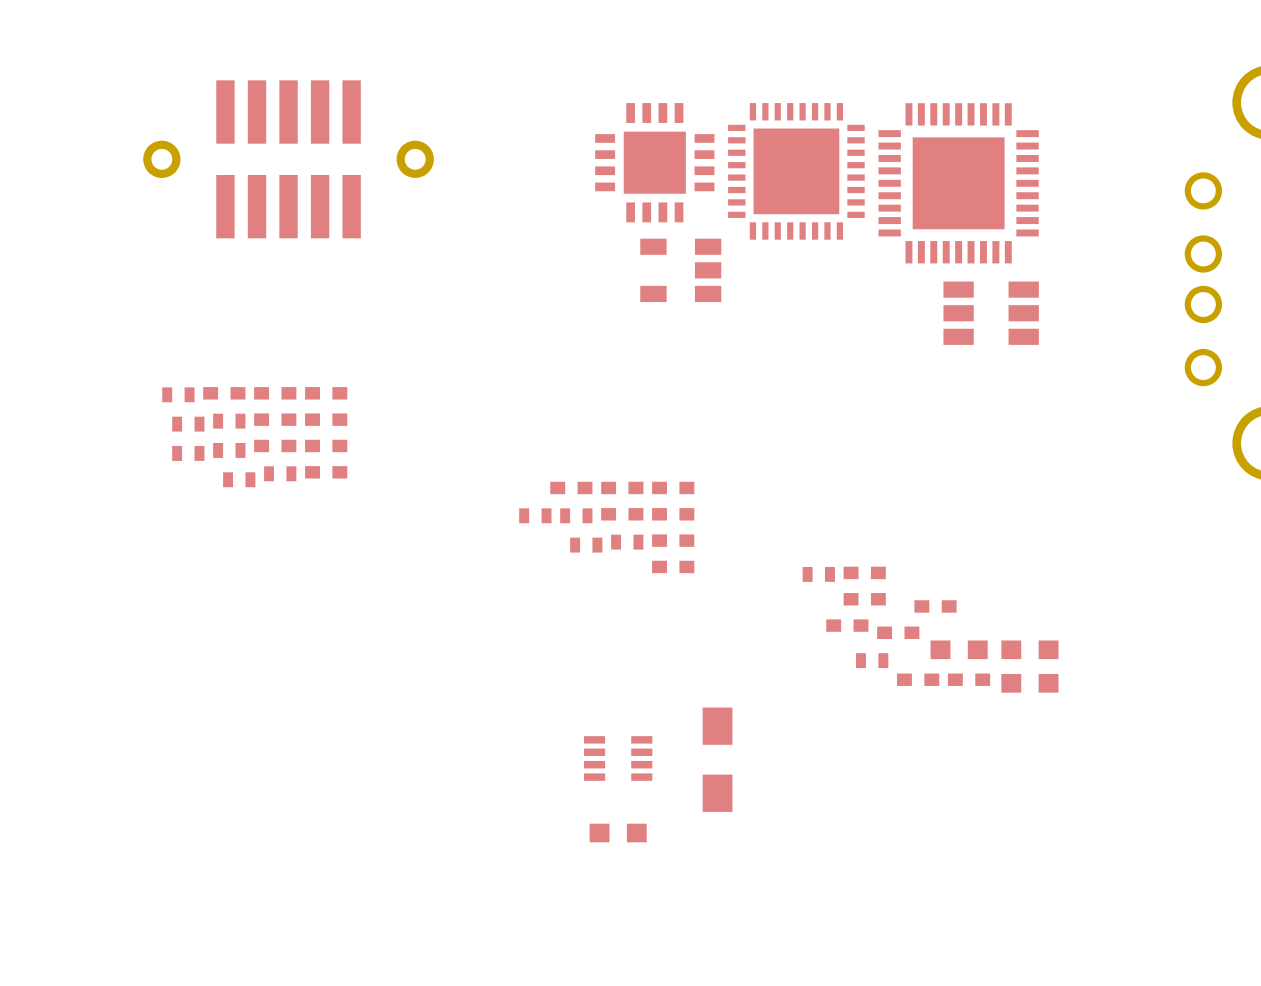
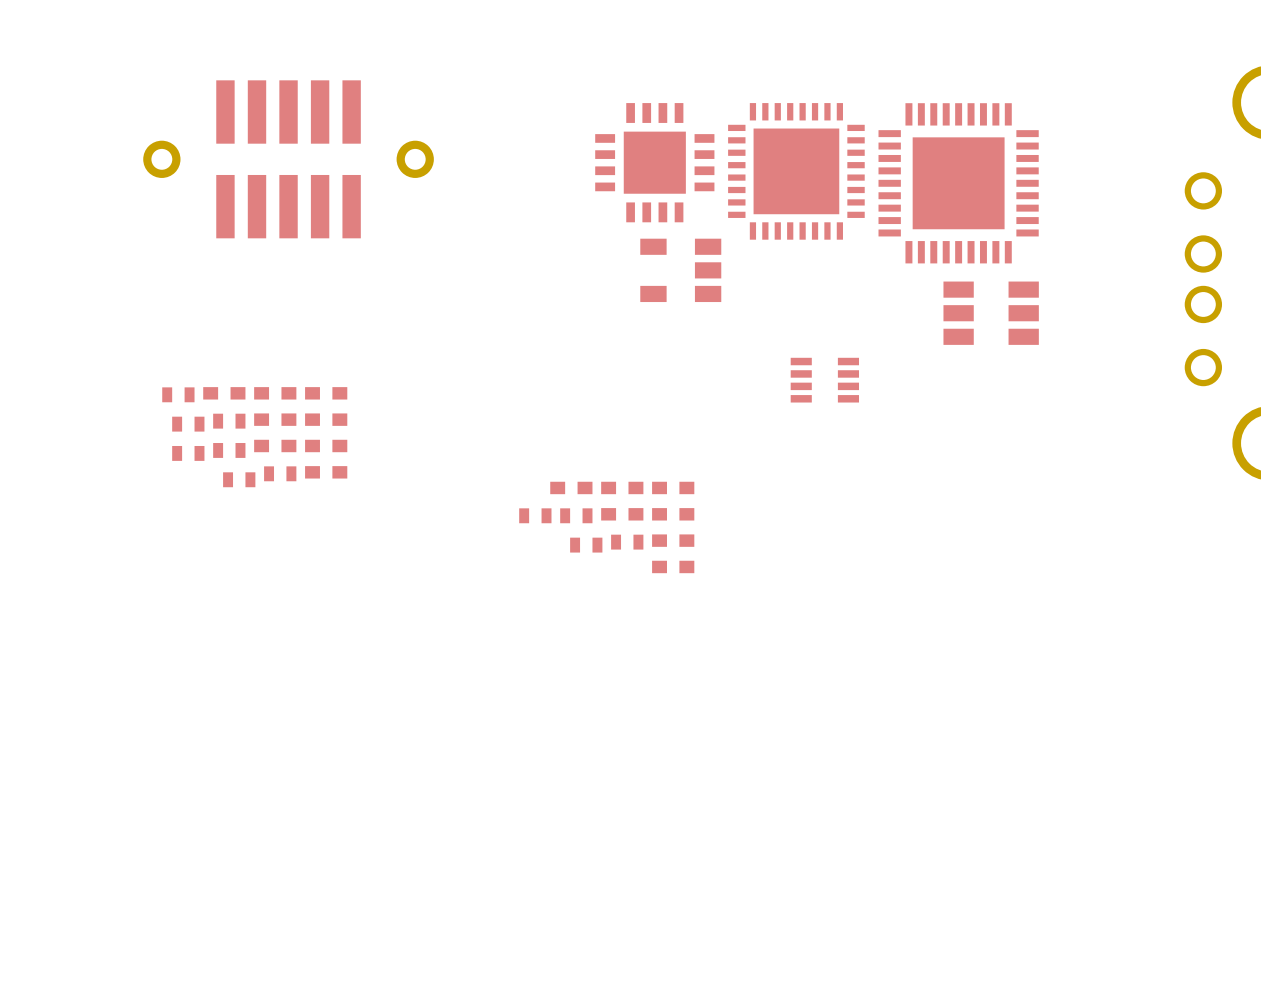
part: (864, 572) -> none
part: (818, 574) -> none
part: (864, 599) -> none
part: (935, 606) -> none
part: (847, 625) -> none
part: (898, 632) -> none
part: (959, 649) -> none
part: (1029, 649) -> none
part: (872, 660) -> none
part: (918, 679) -> none
part: (969, 679) -> none
part: (1029, 683) -> none
part position: (618, 758) -> (824, 380)
part: (717, 759) -> none
part: (618, 833) -> none

